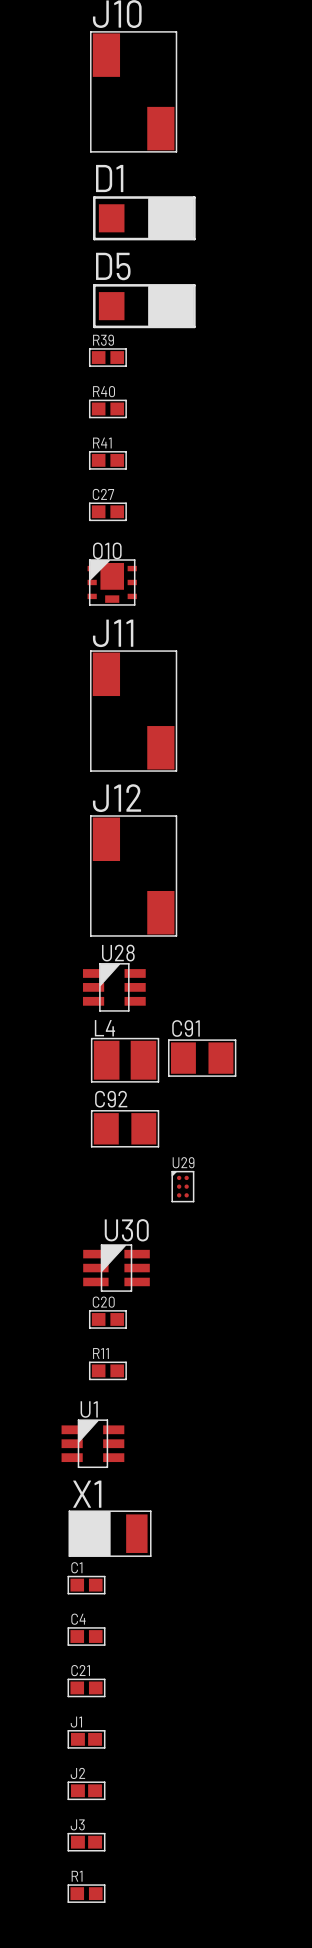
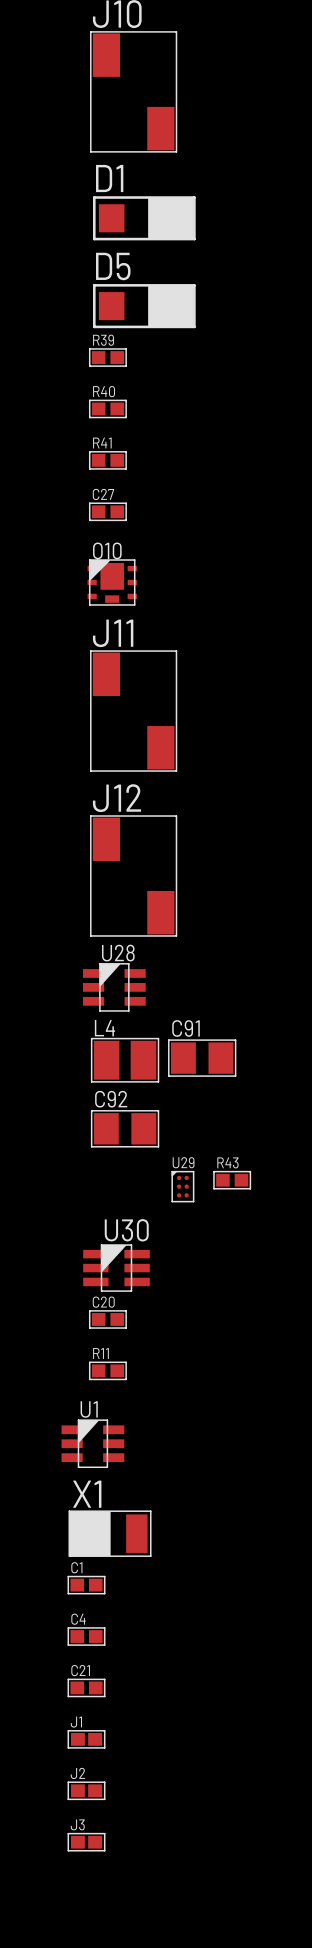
R43: none -> (232, 1180)
R1: (86, 1893) -> none

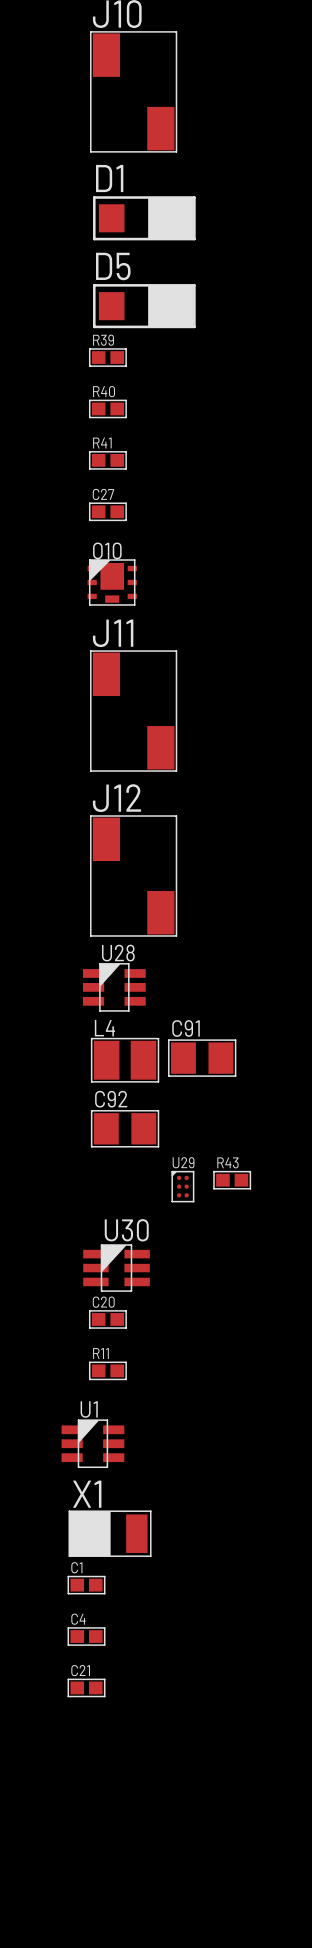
J1: (86, 1739) -> none
J2: (86, 1790) -> none
J3: (86, 1842) -> none

